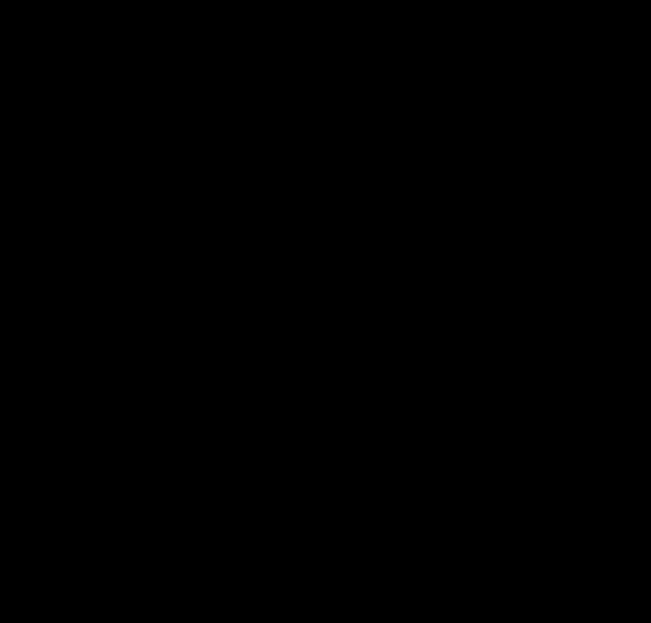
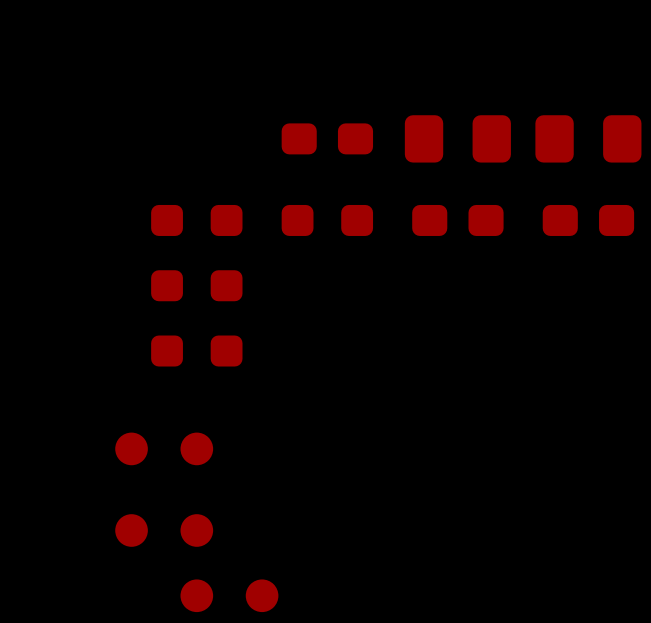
part: none -> (327, 138)
part: none -> (457, 138)
part: none -> (588, 138)
part: none -> (196, 220)
part: none -> (327, 220)
part: none -> (457, 220)
part: none -> (588, 220)
part: none -> (196, 285)
part: none -> (196, 351)
part: none -> (131, 448)
part: none -> (196, 448)
part: none -> (131, 530)
part: none -> (196, 530)
part: none -> (196, 595)
part: none -> (262, 595)

